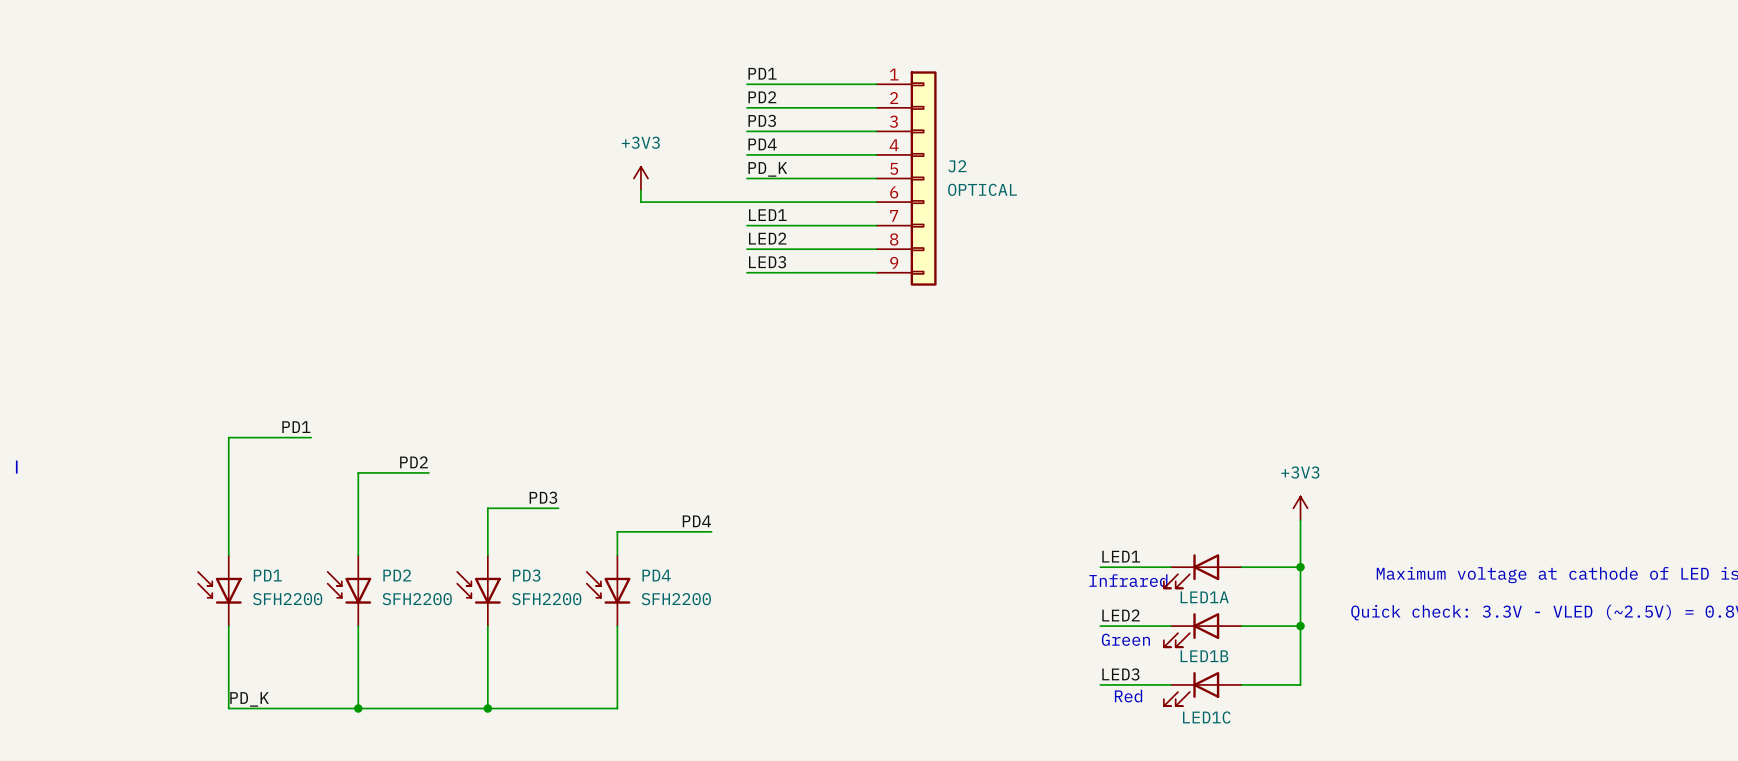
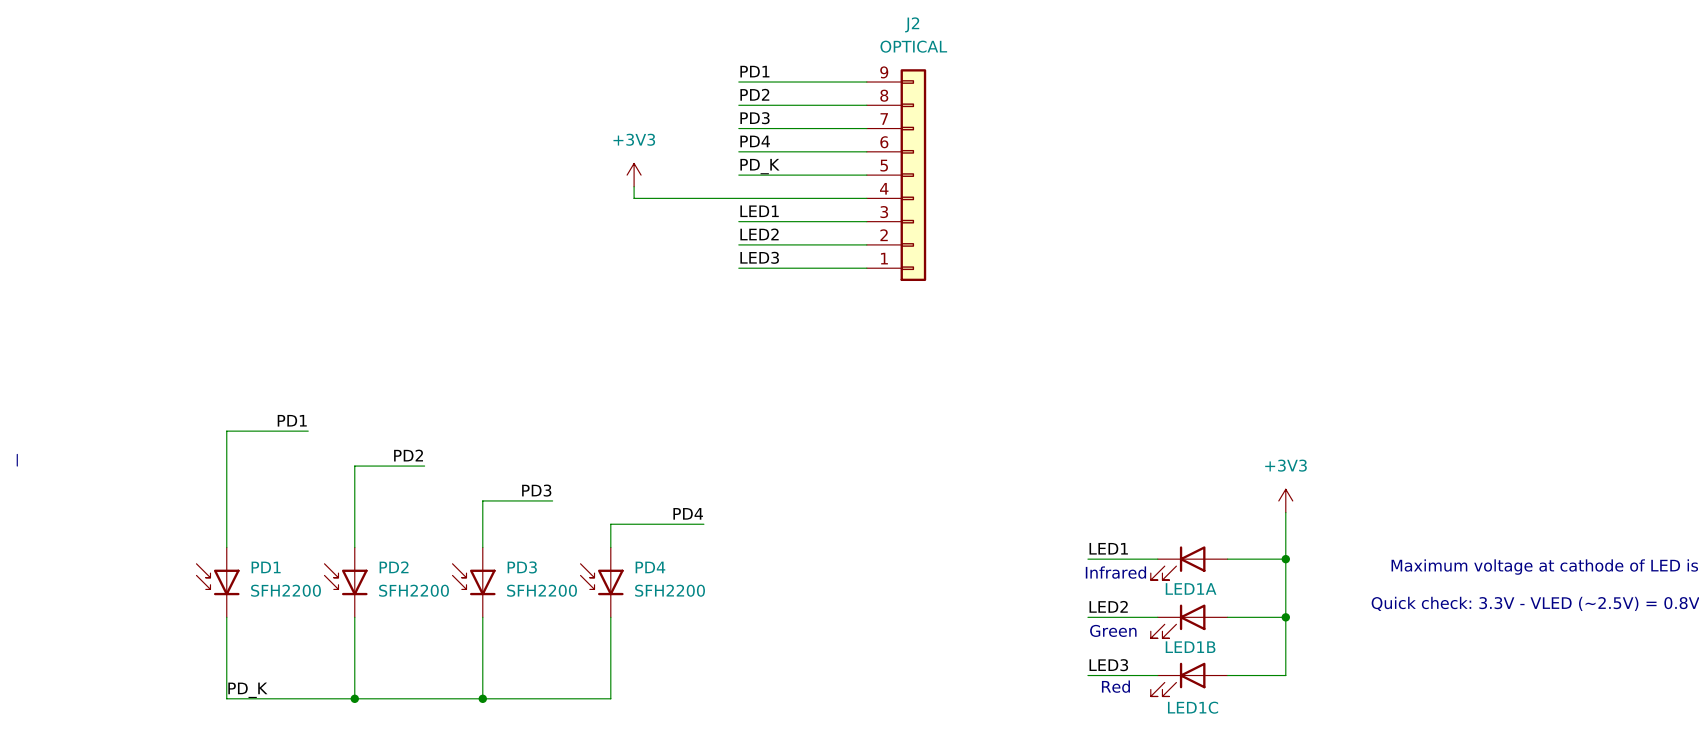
J2 name position: J2 (957, 166) -> J2 (912, 24)
J2 flip: as is (923, 178) -> up-down (913, 175)
J2 value position: OPTICAL (982, 189) -> OPTICAL (913, 46)

